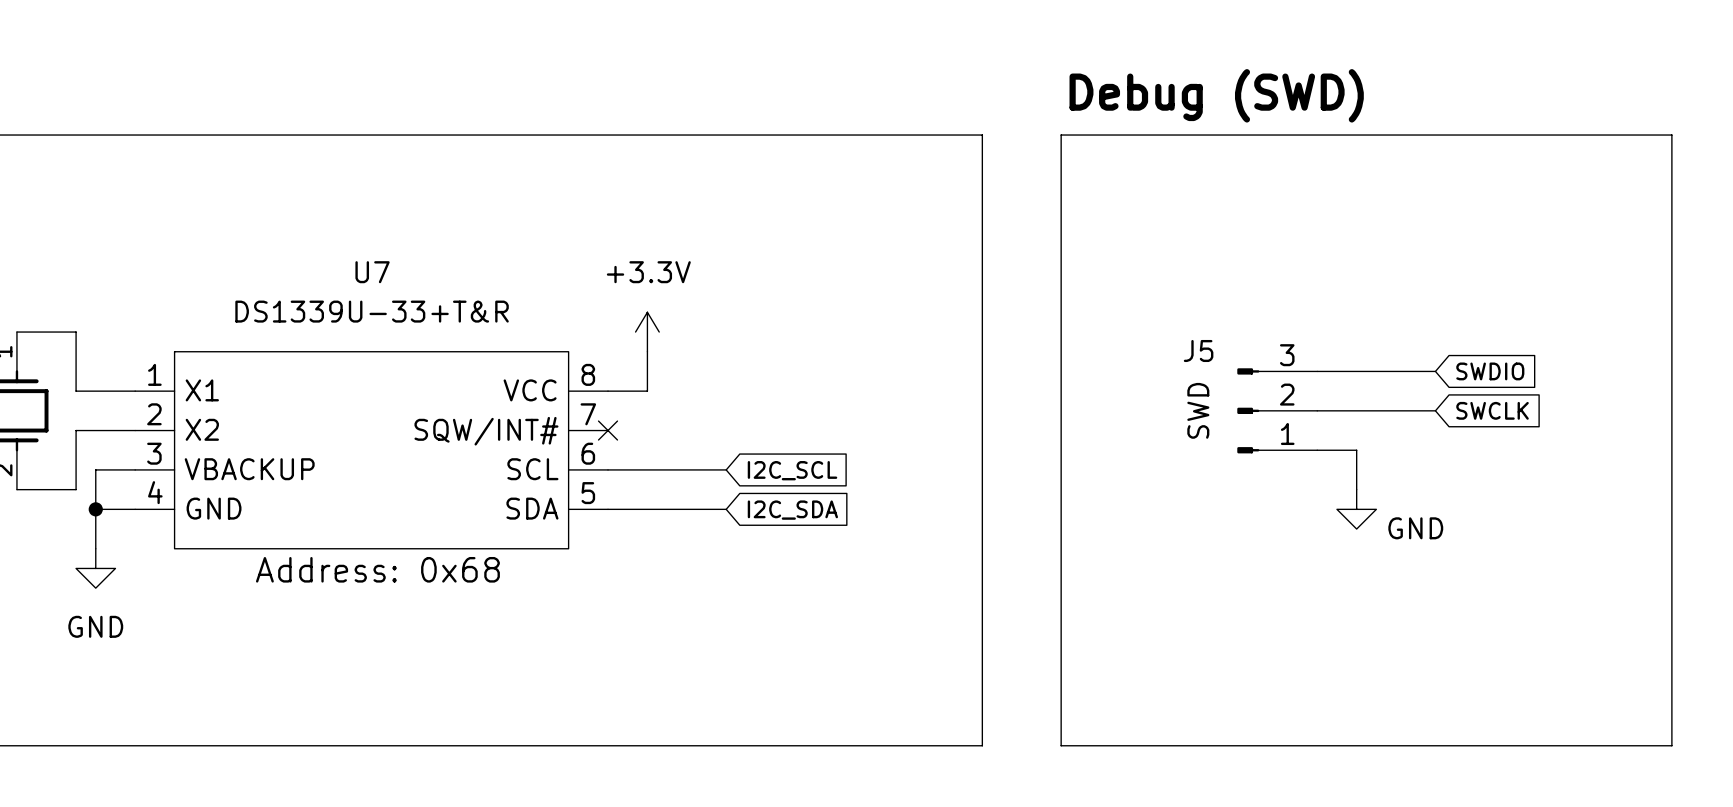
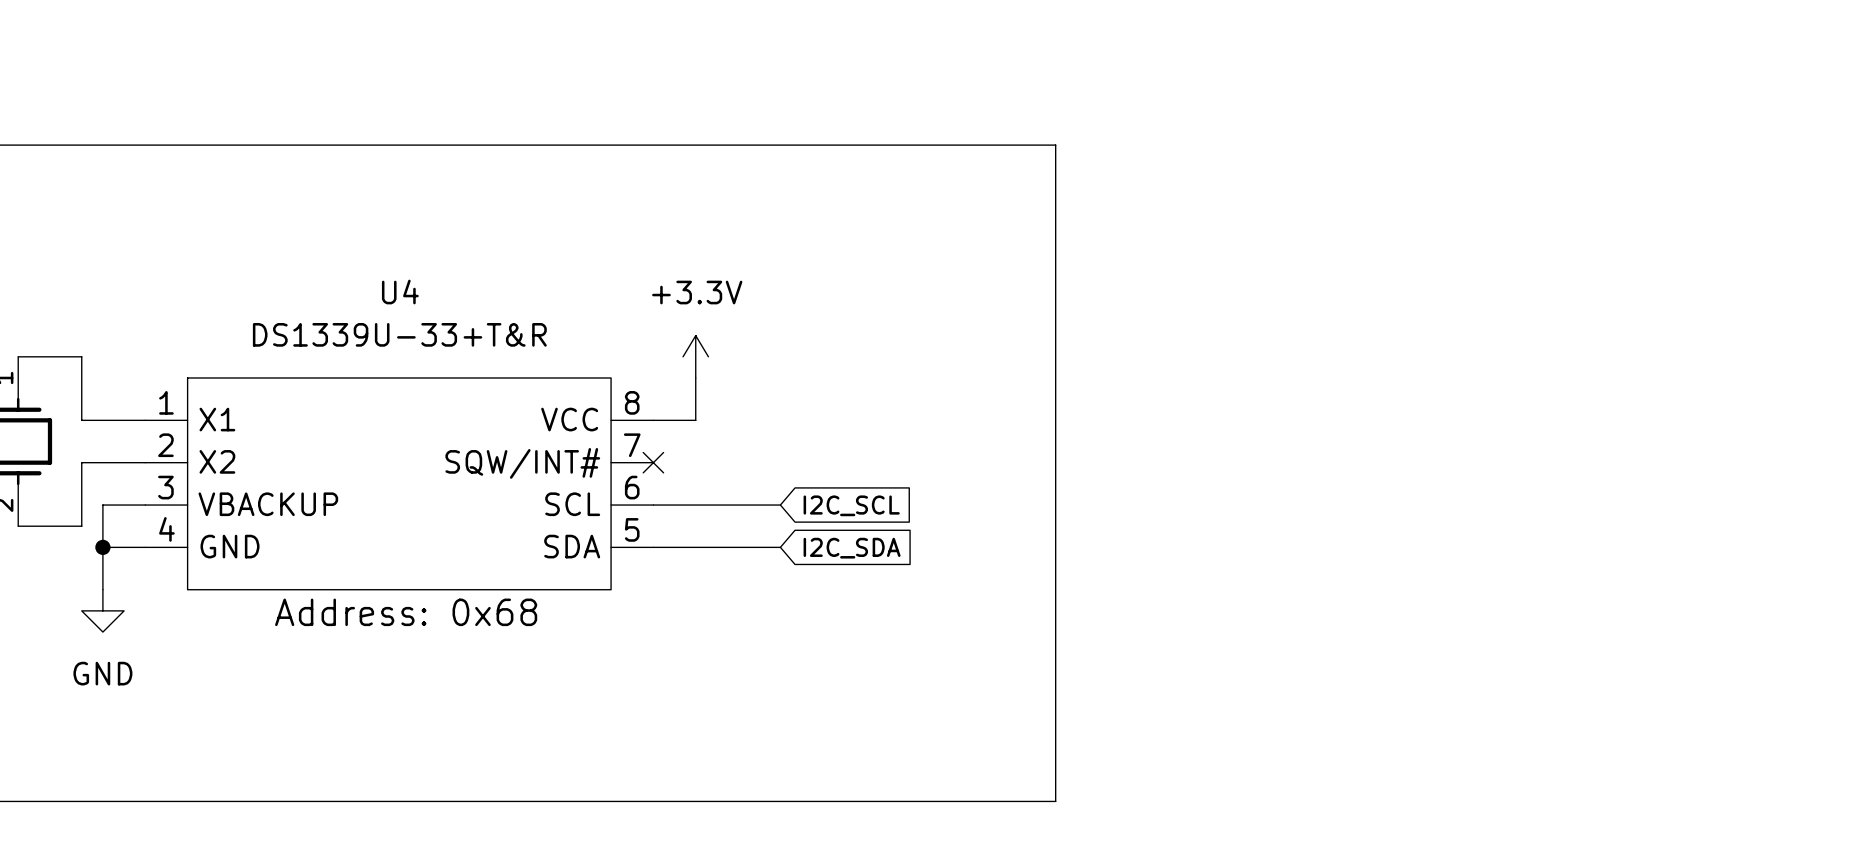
text: Debug (SWD) (1216, 95) -> none
line: (1061, 135) (1671, 135) (1671, 745) (1061, 745) (1061, 135) -> none
U7 name: U7 (372, 272) -> U4 (400, 292)
wire: (1317, 371) (1435, 371) -> none
global label: SWDIO (1490, 371) -> none
J5: SWD (1277, 410) -> none
wire: (1317, 410) (1435, 410) -> none
global label: SWCLK (1492, 410) -> none
wire: (1317, 450) (1356, 450) (1356, 489) -> none
power symbol: GND (1356, 509) -> none

